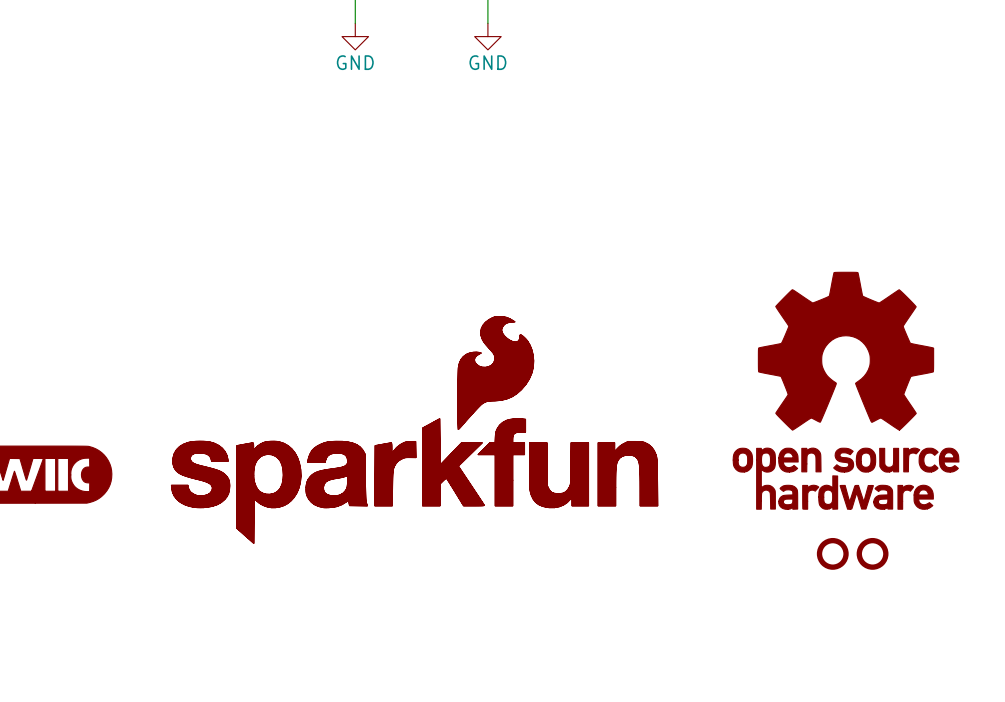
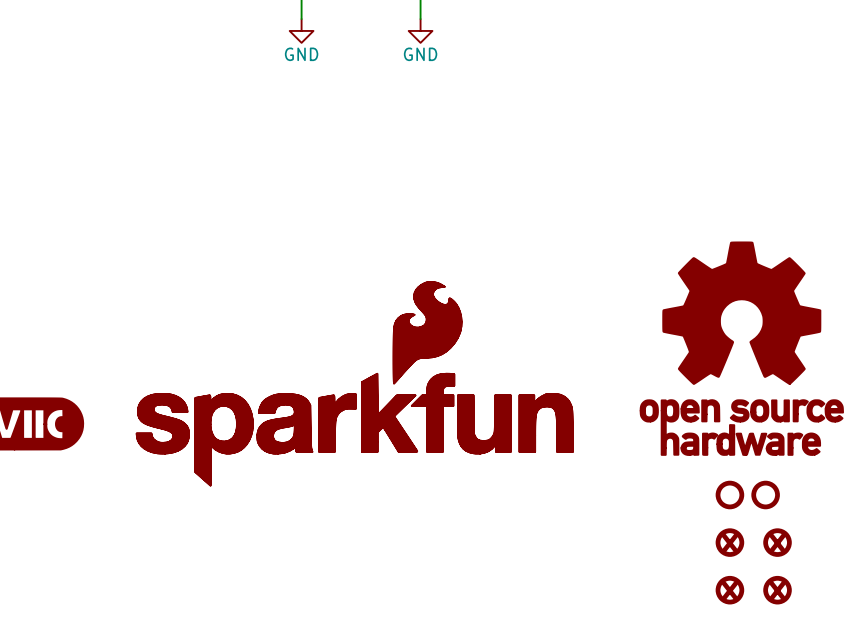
part: none -> (729, 542)
part: none -> (777, 542)
part: none -> (729, 590)
part: none -> (777, 590)

